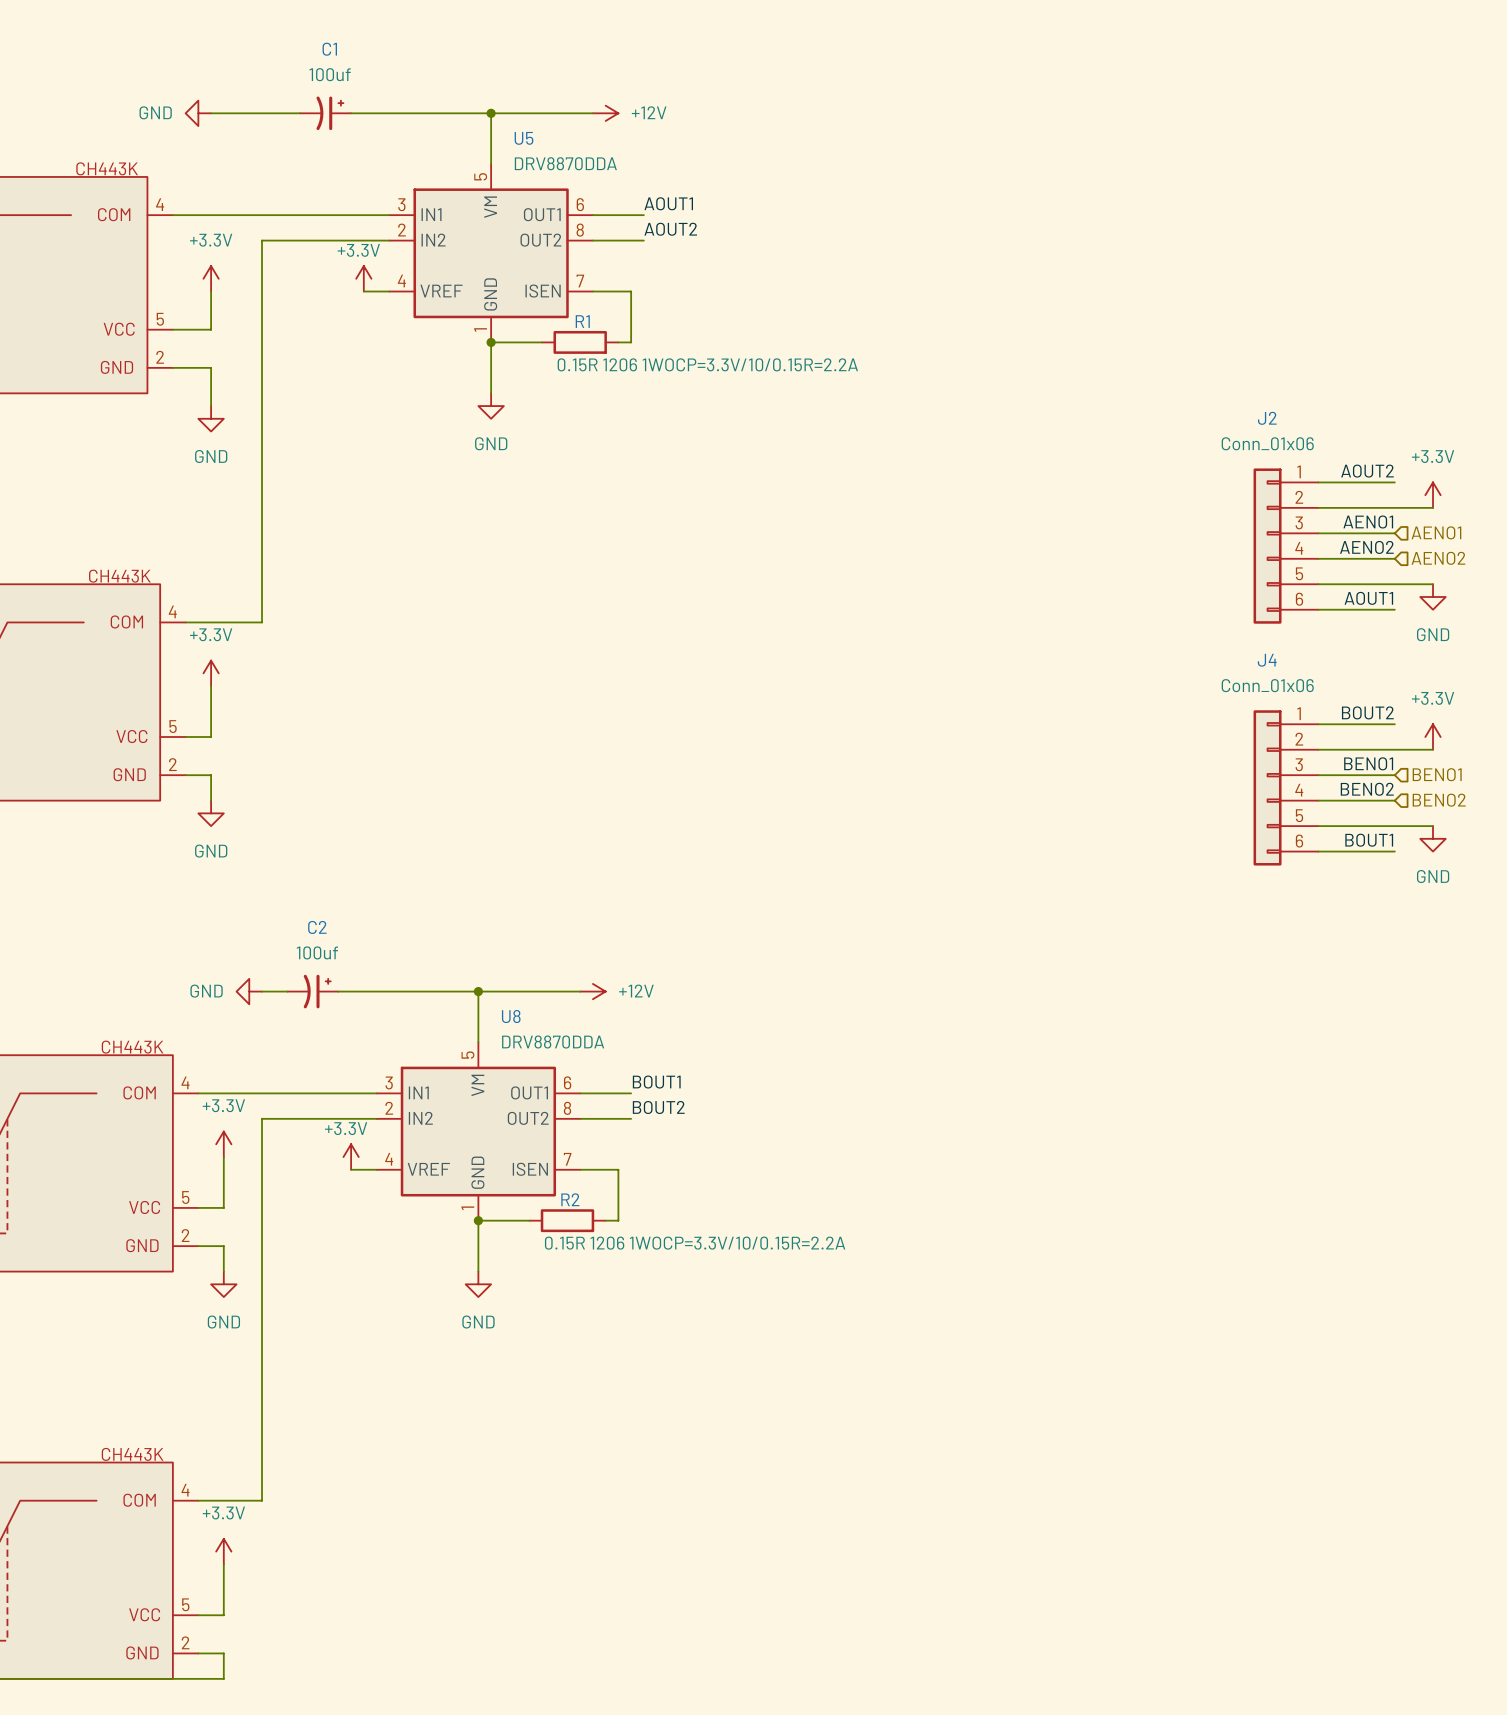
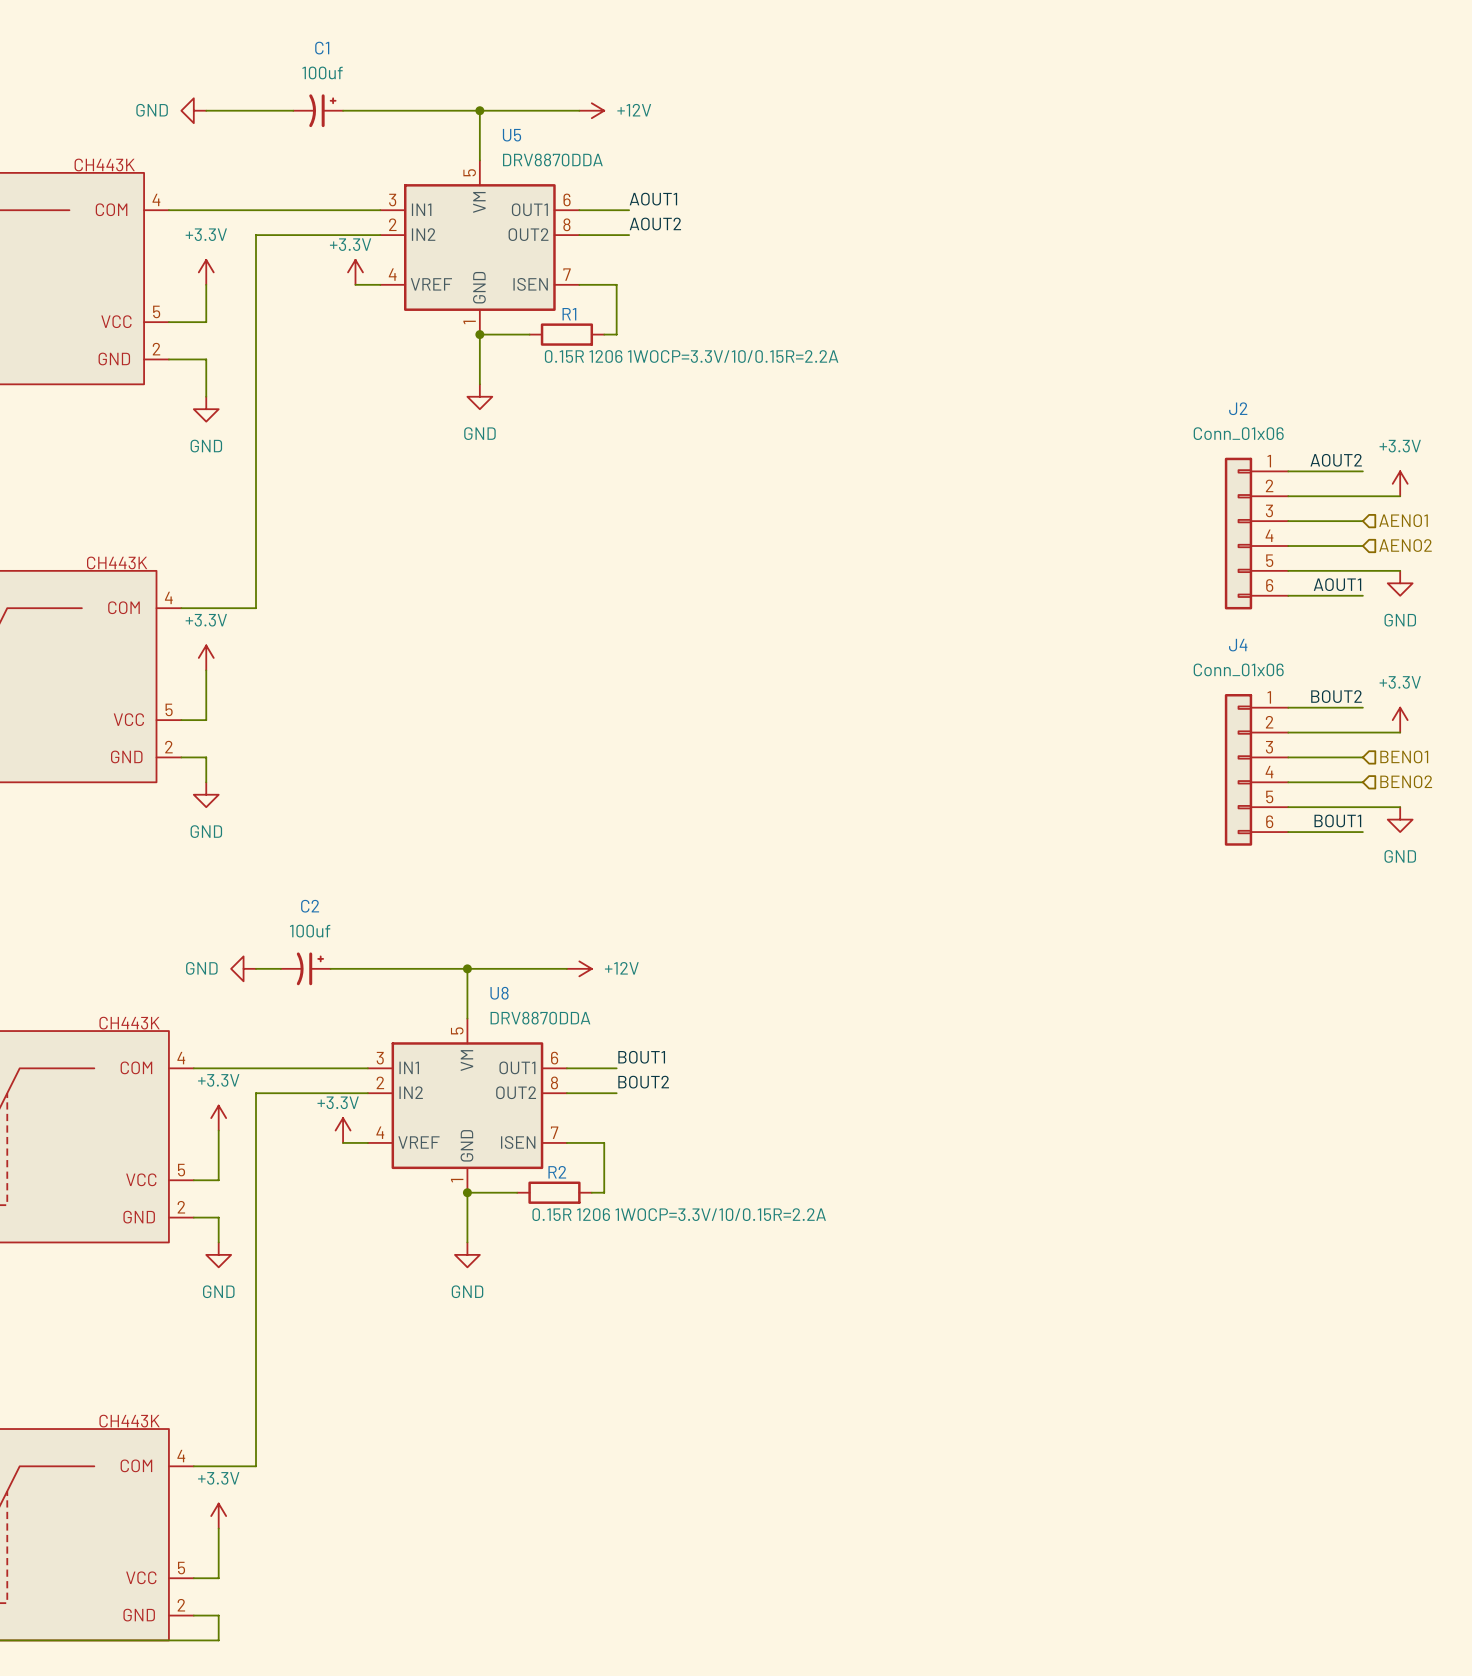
label: AENO1 (1368, 521) -> none
label: AENO2 (1366, 547) -> none
label: BENO1 (1368, 763) -> none
label: BENO2 (1367, 789) -> none

